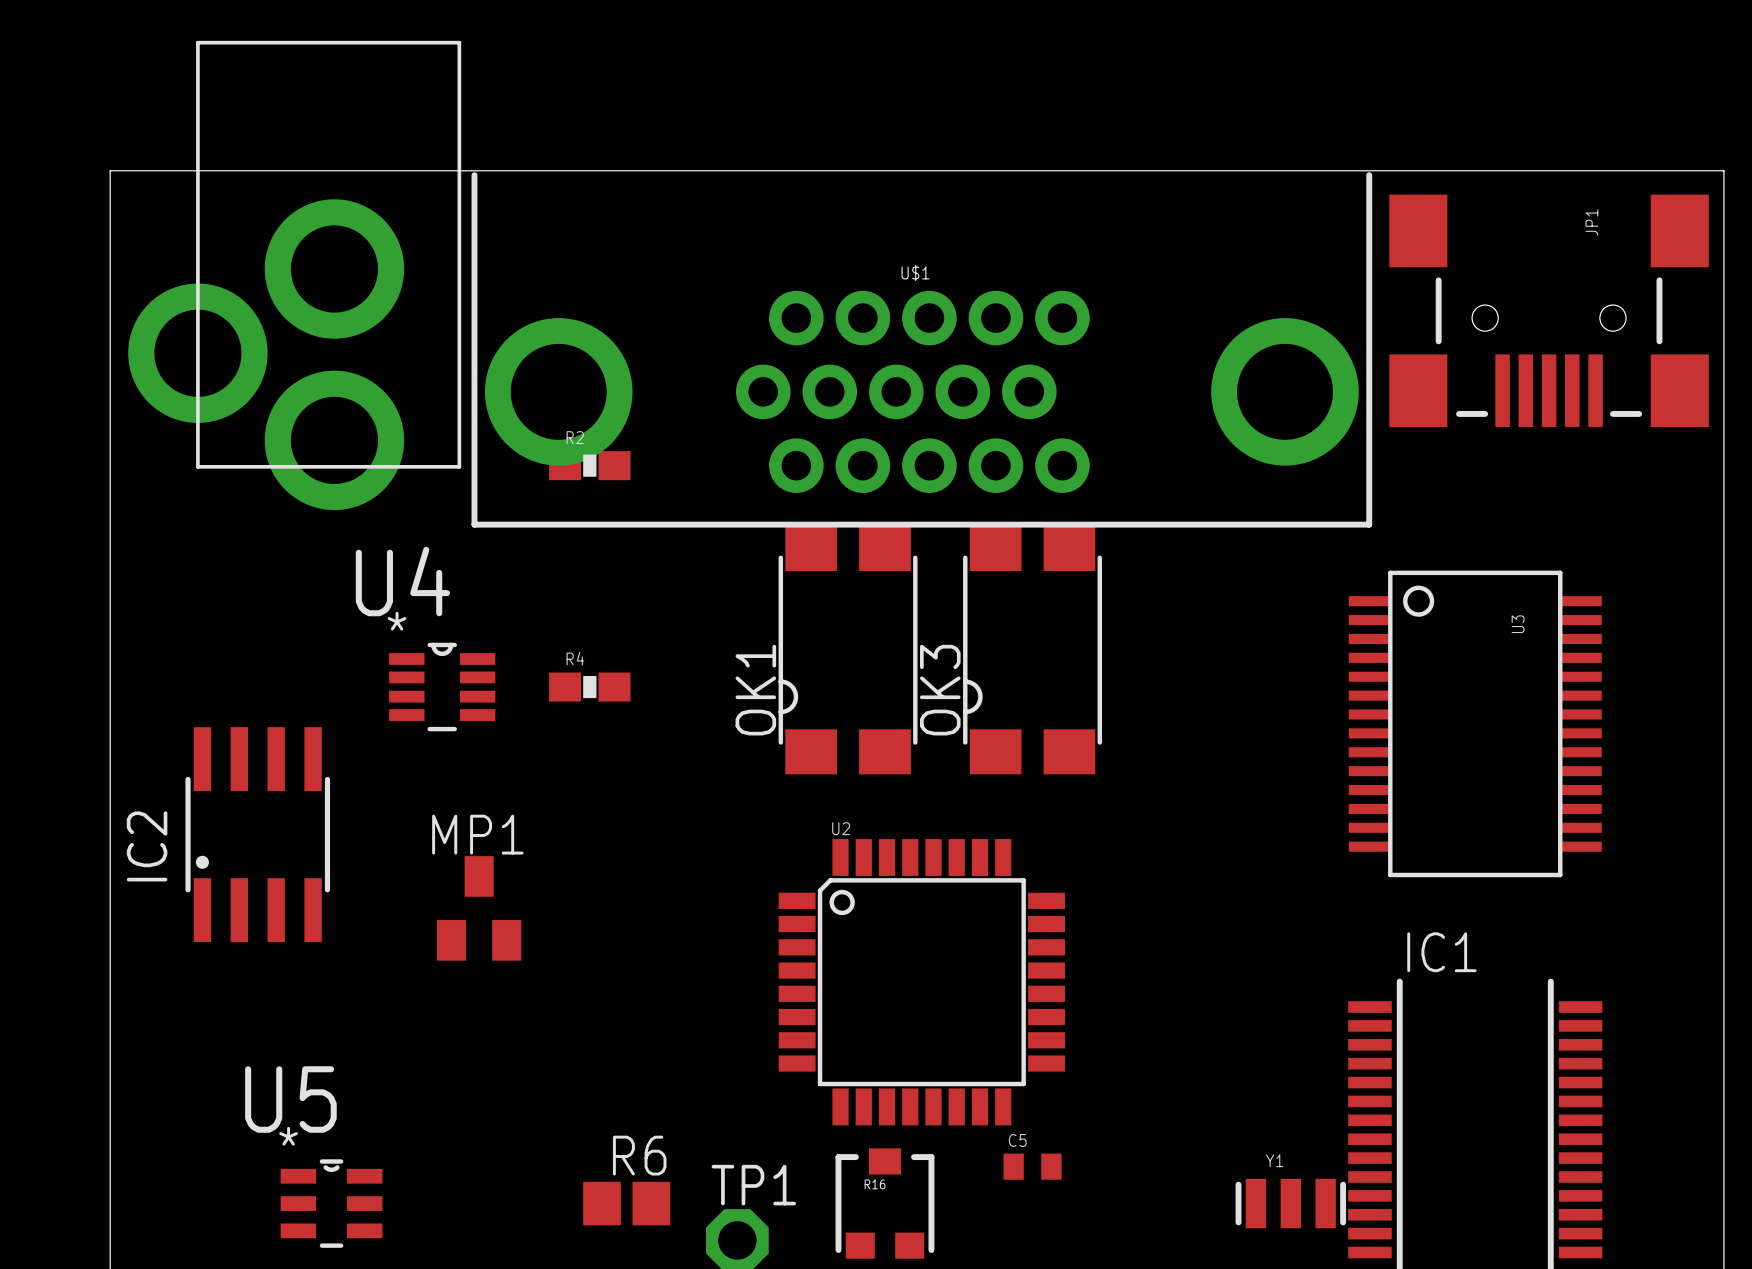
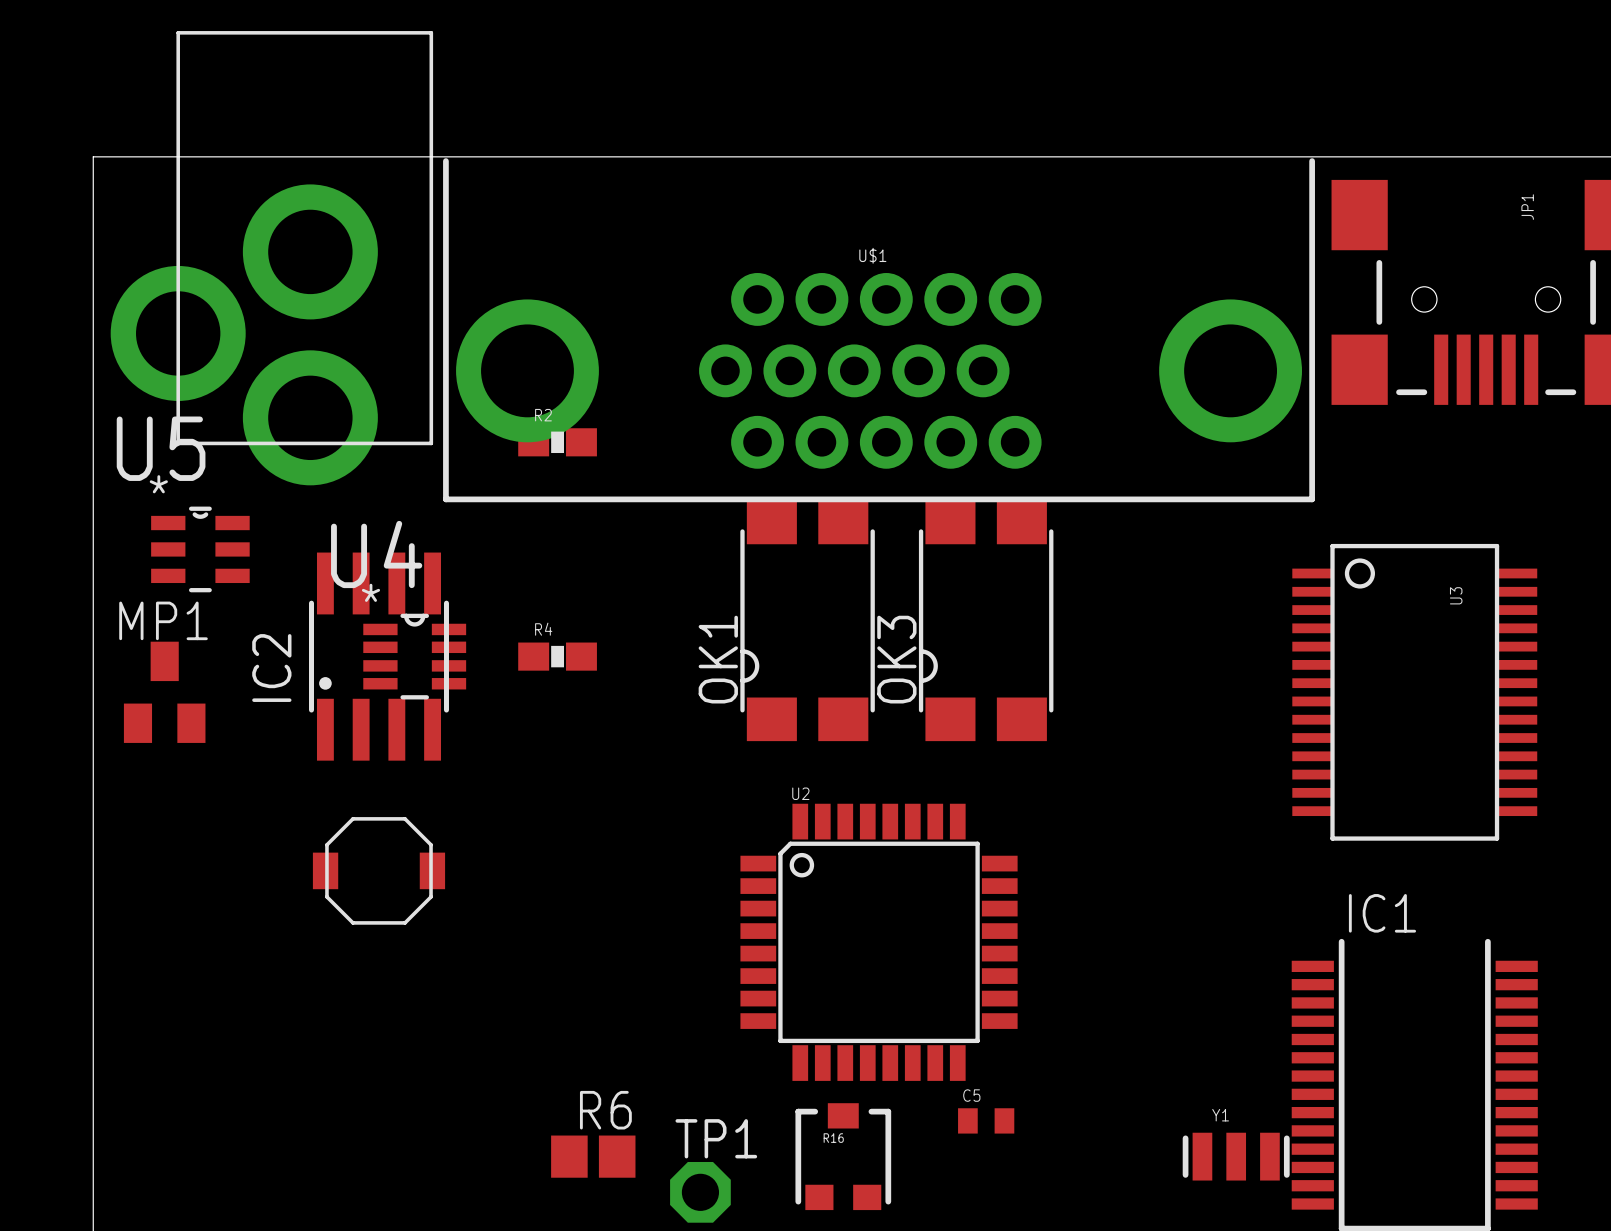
IC2 position: (257, 834) -> (378, 656)
part: none -> (378, 870)
MP1 position: (479, 908) -> (164, 692)
U5 position: (331, 1203) -> (200, 549)

